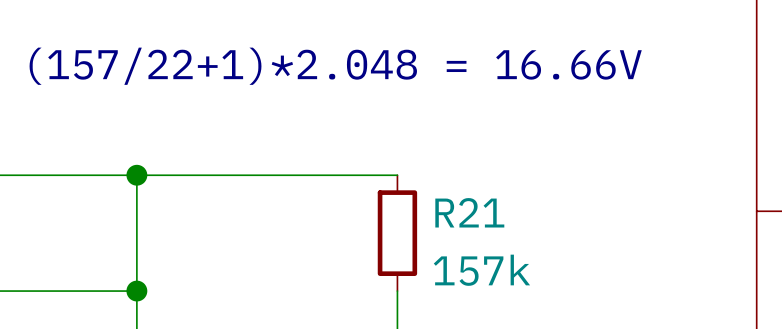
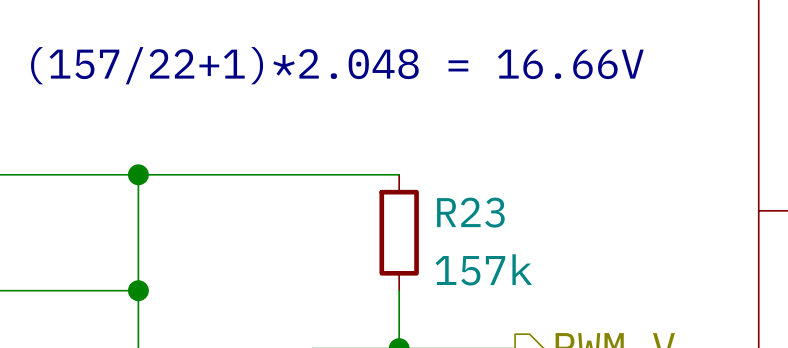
R21 name: R21 (469, 212) -> R23 (470, 212)

